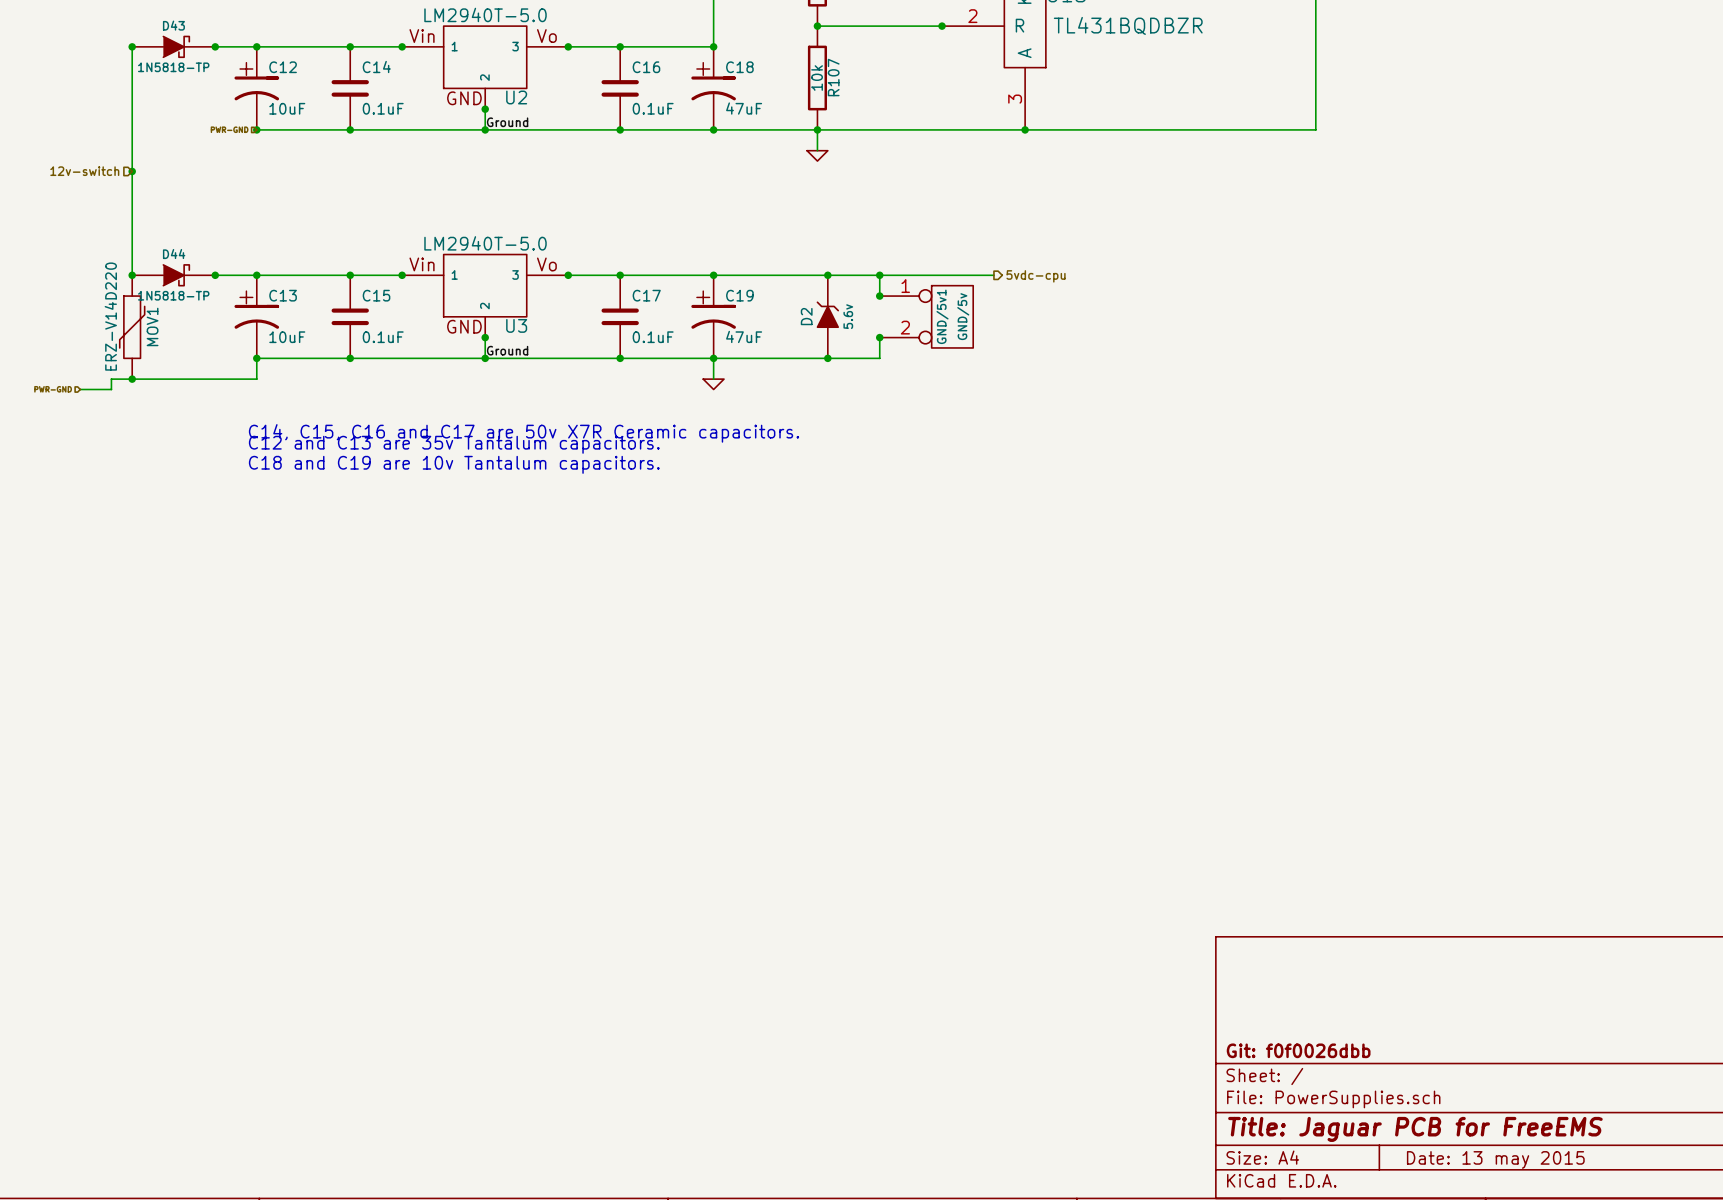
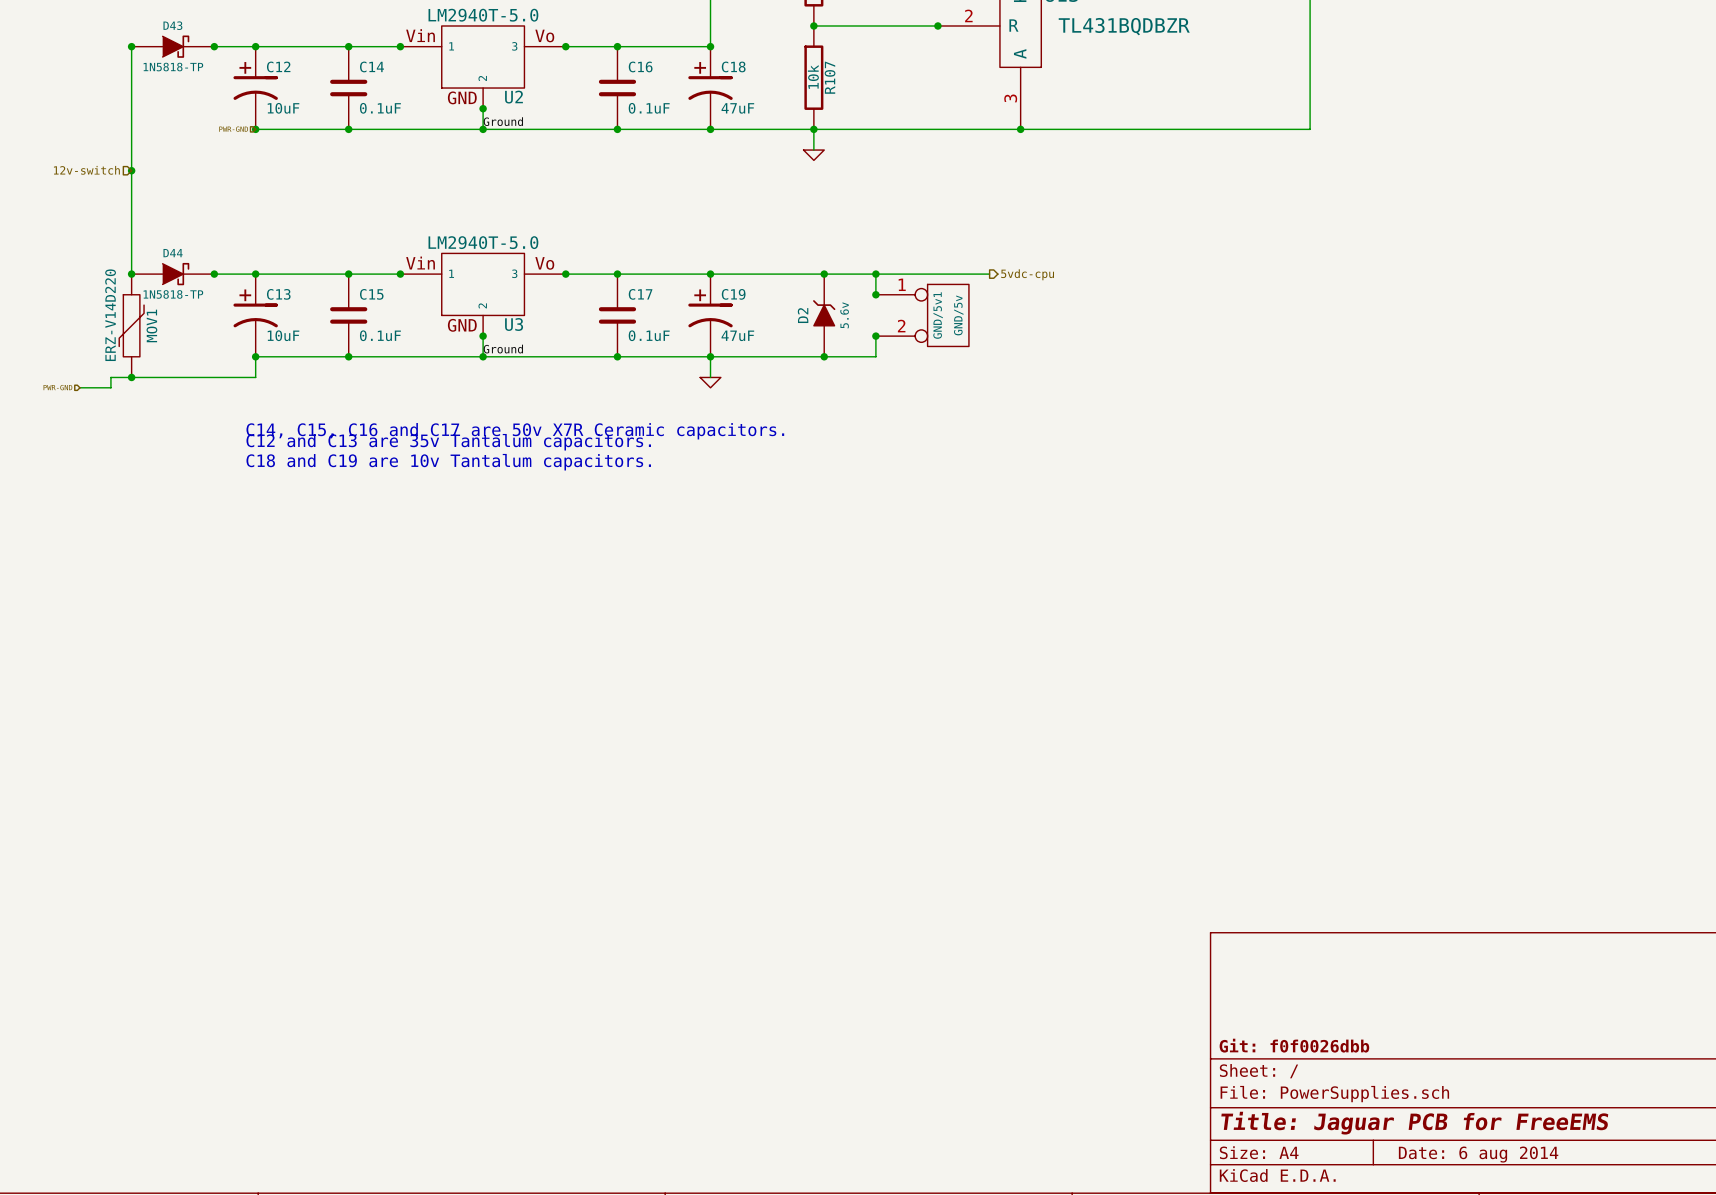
title block: Date: 13 may 2015 (1495, 1159) -> Date: 6 aug 2014 (1478, 1154)

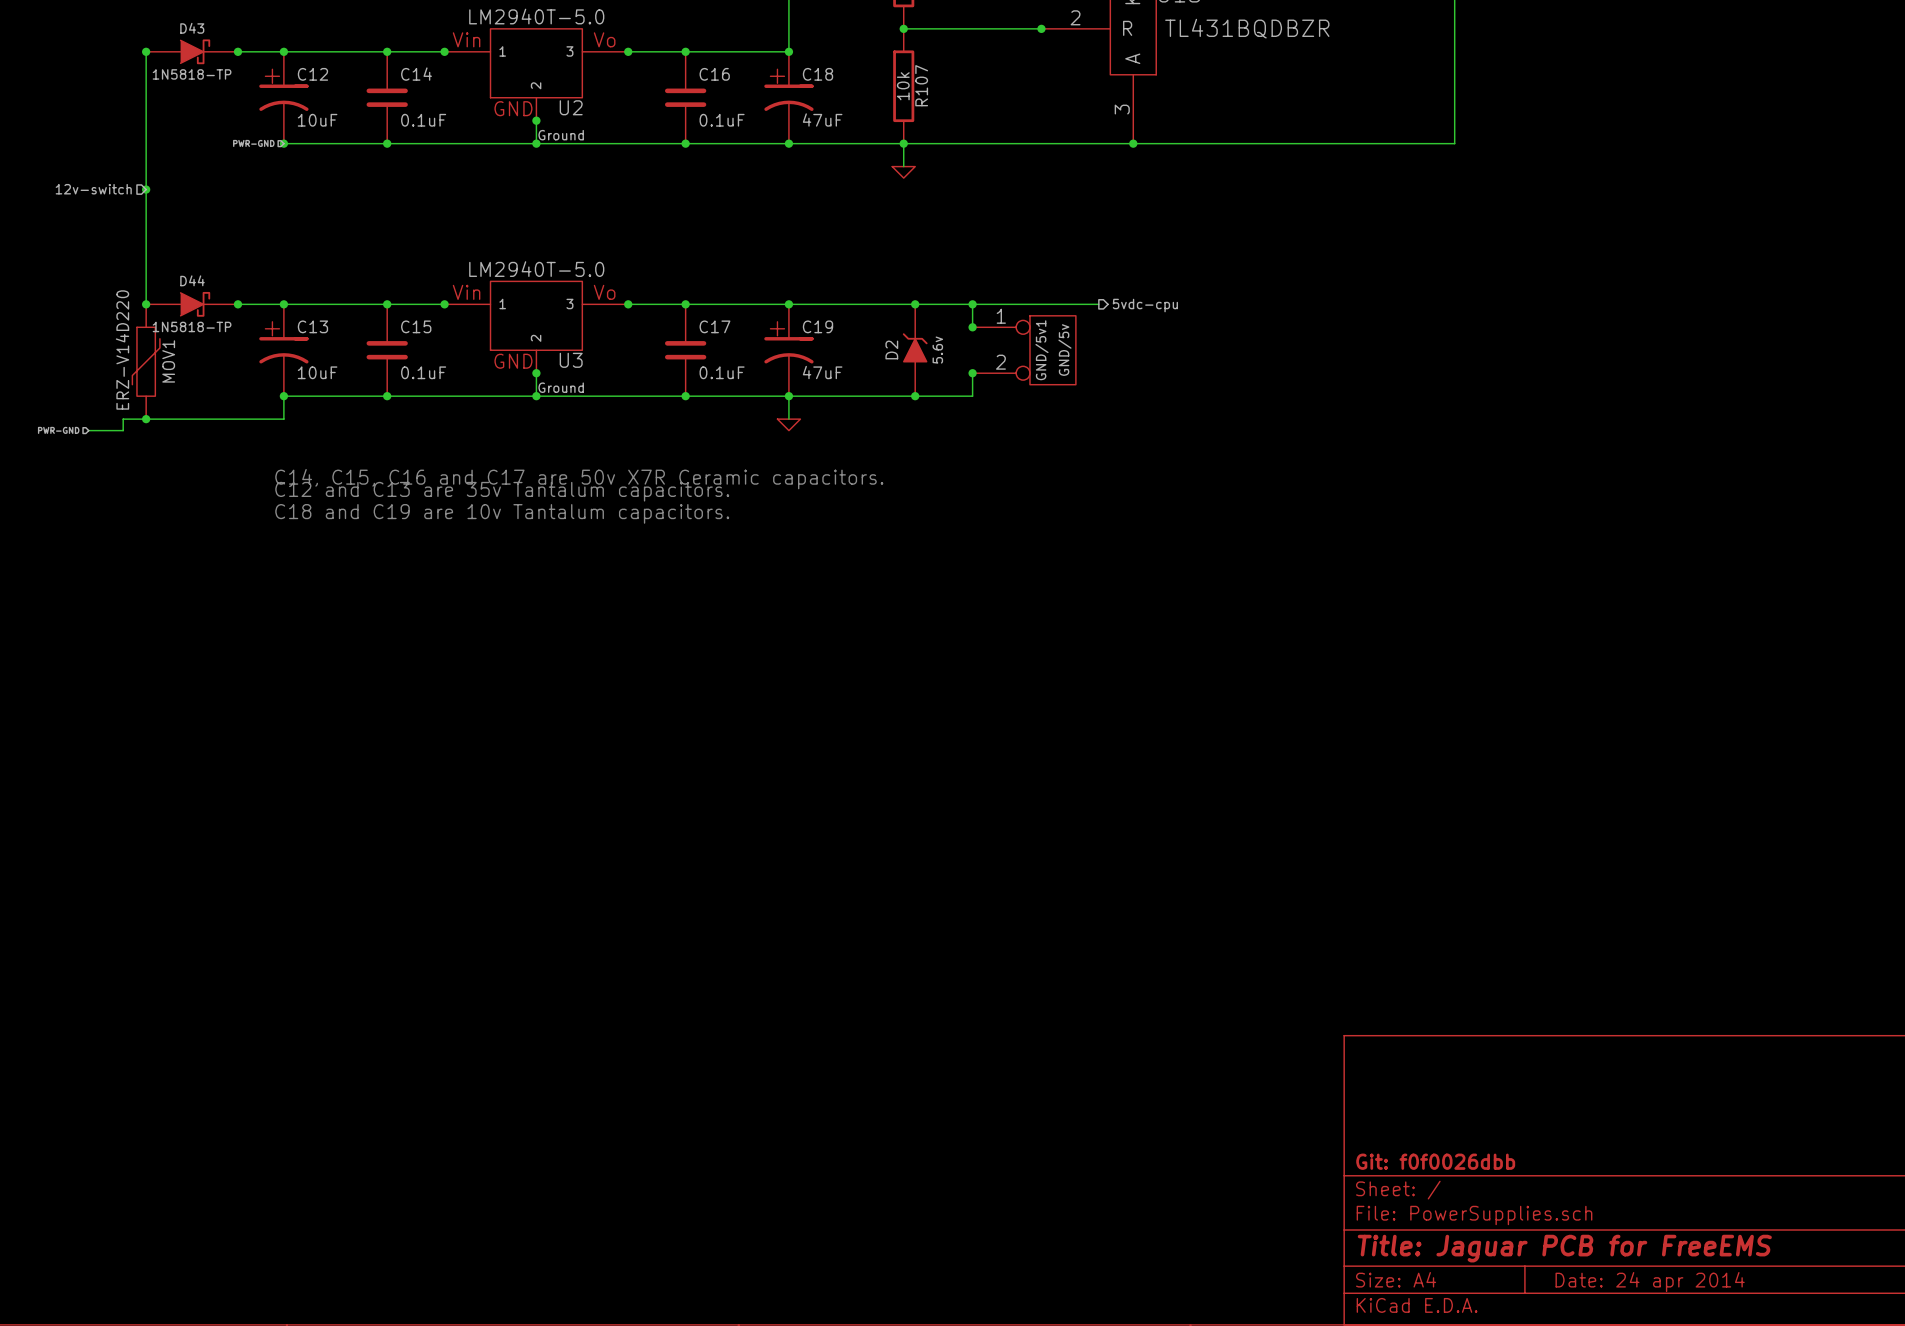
title block: Date: 6 aug 2014 (1478, 1154) -> Date: 24 apr 2014 (1650, 1282)

